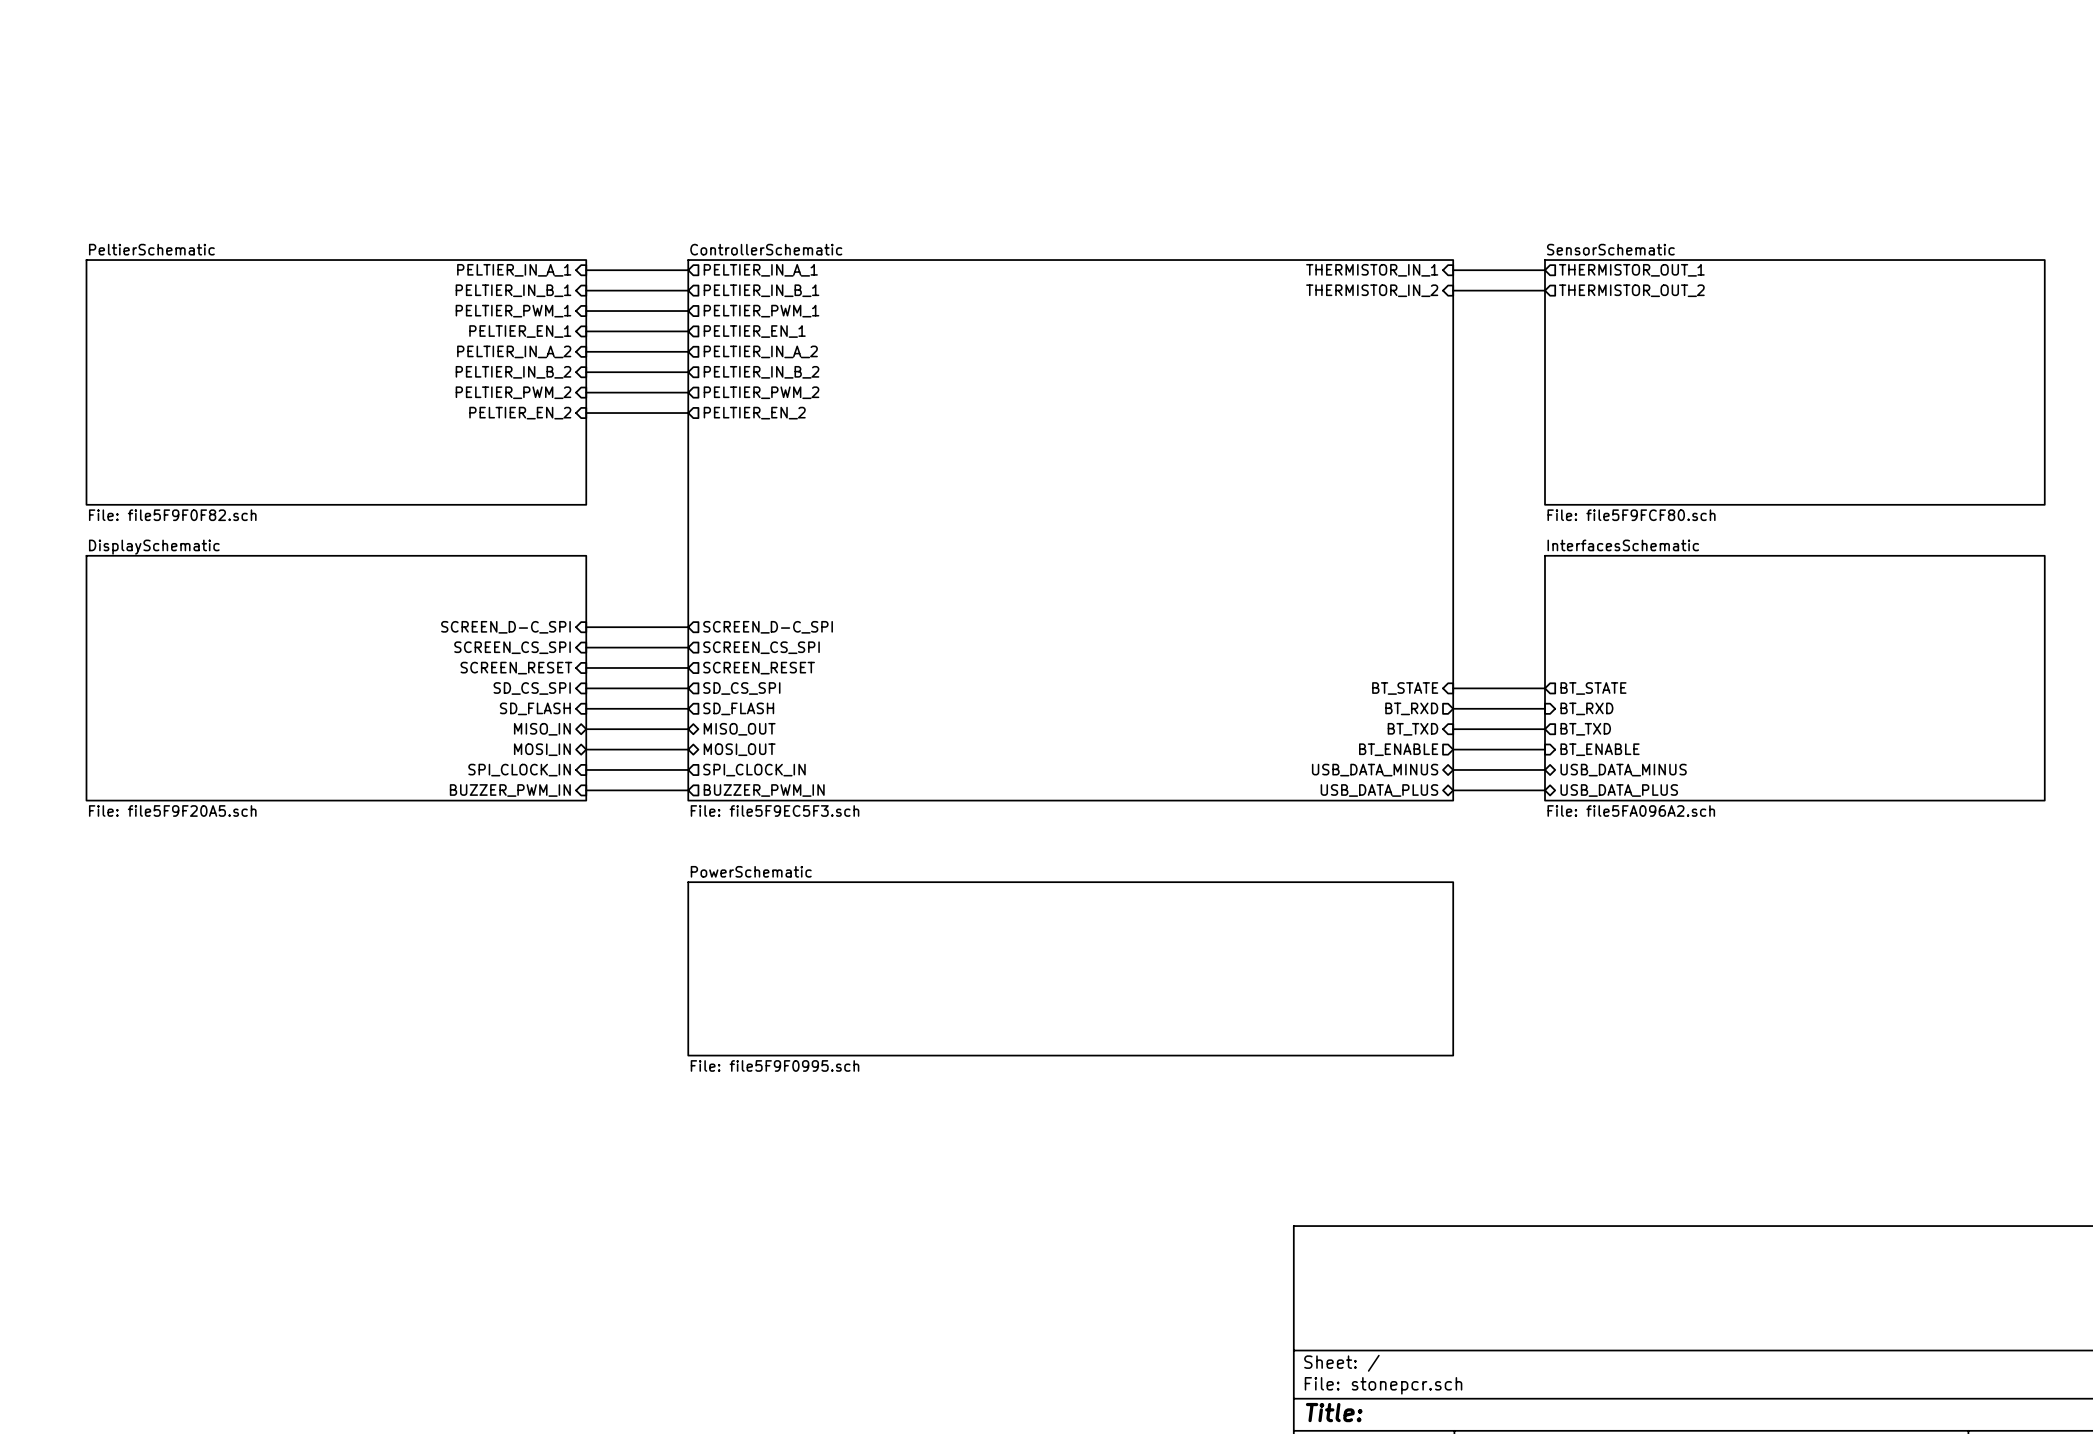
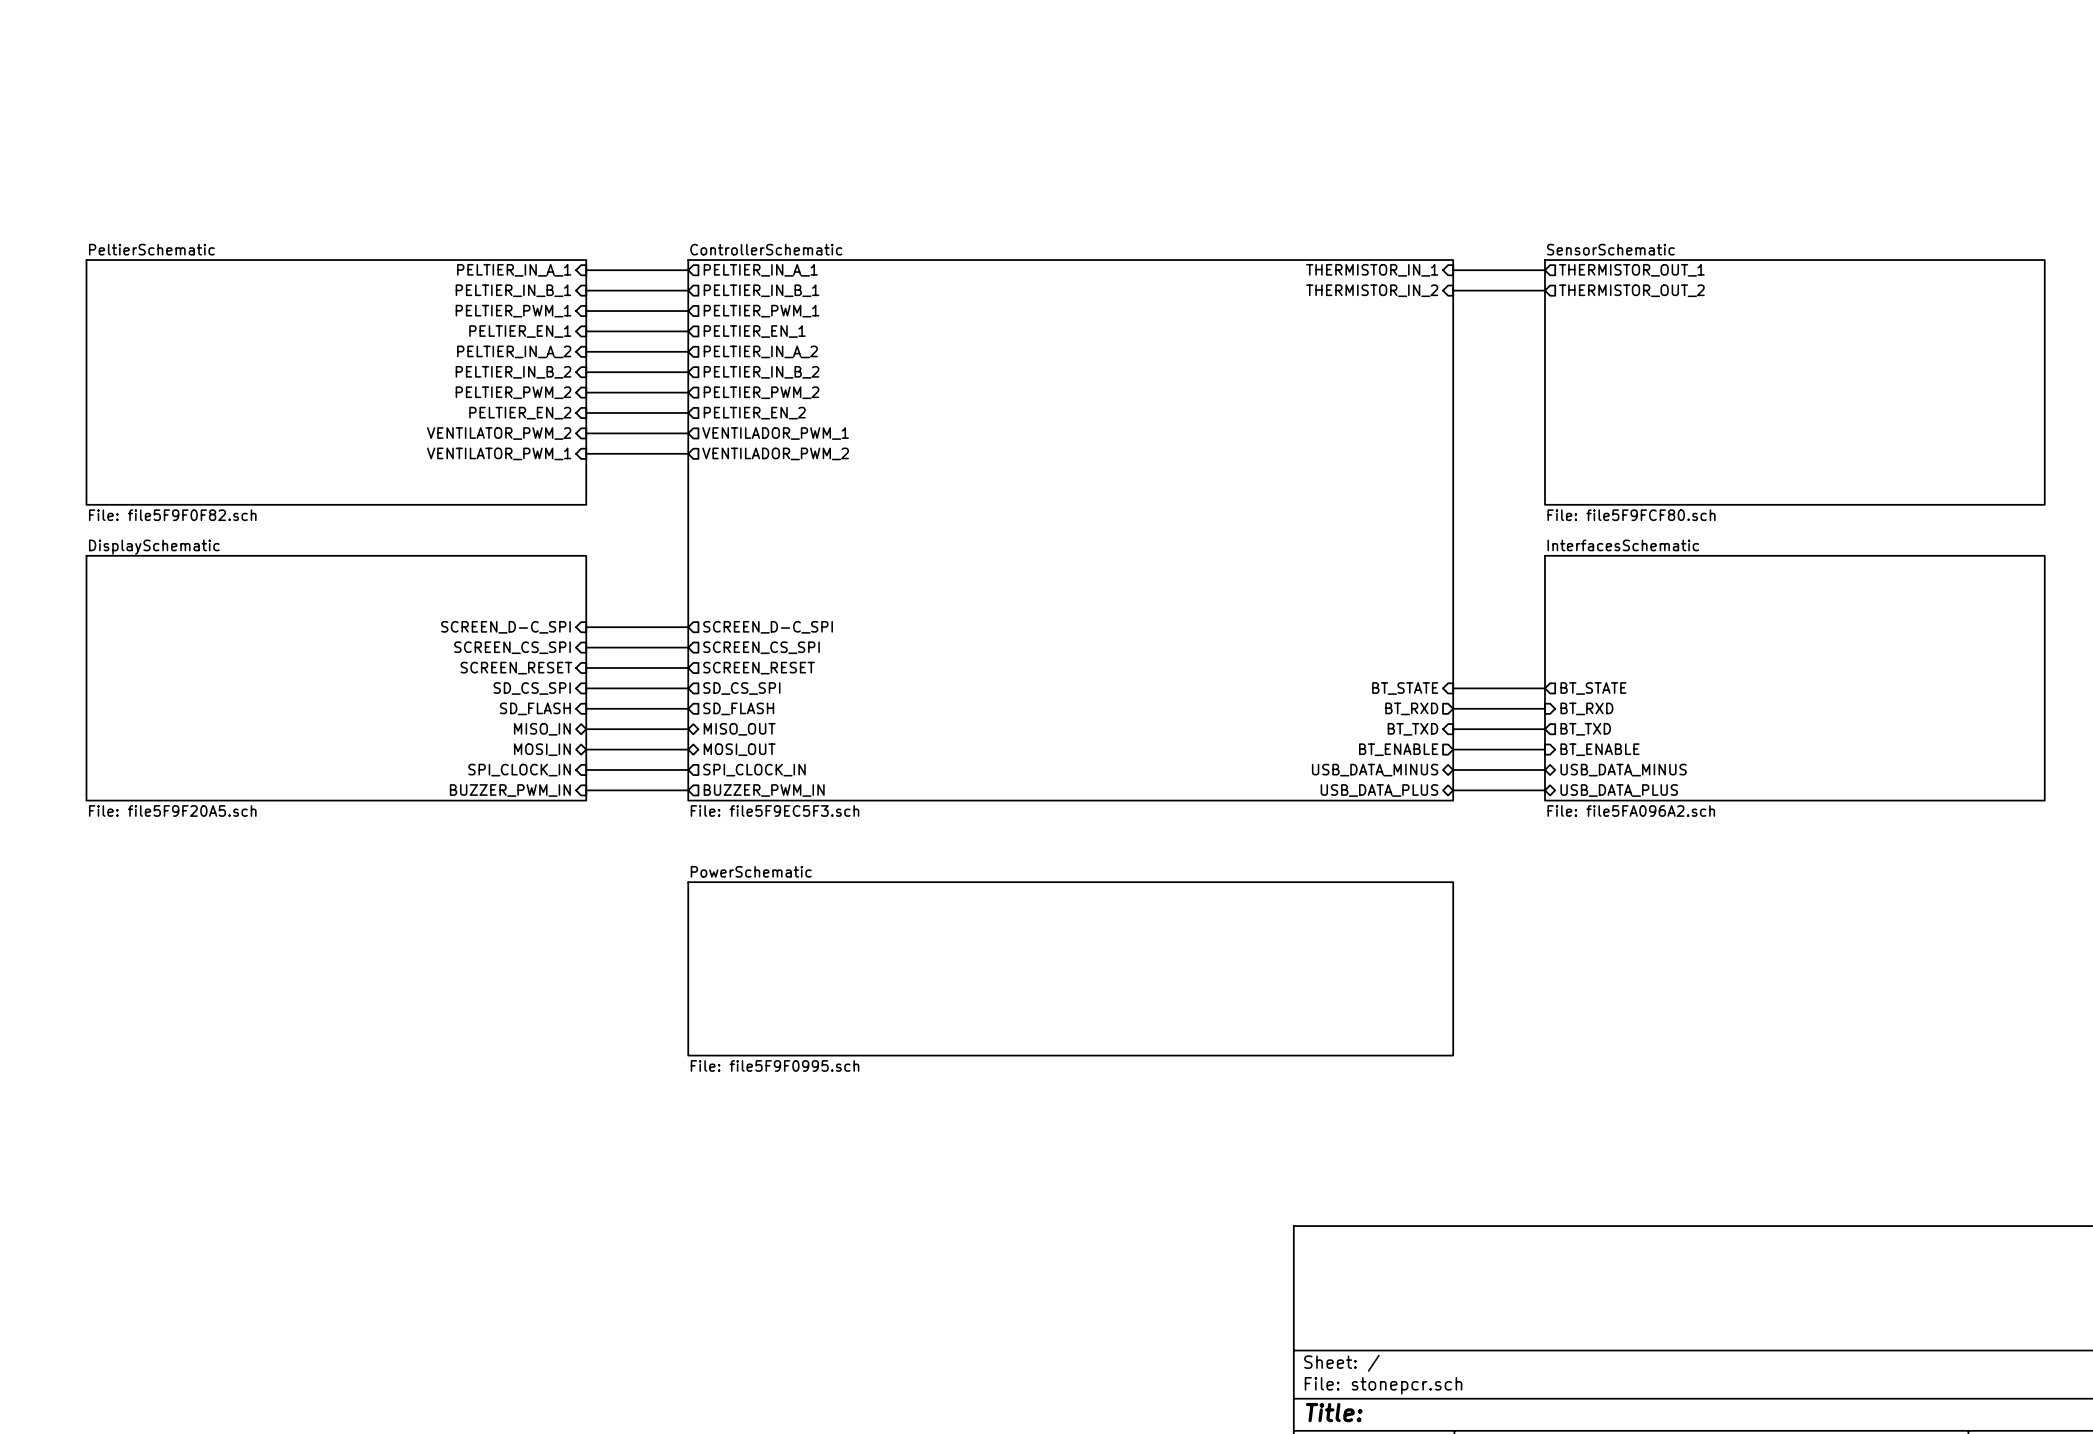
sheet pin: none -> VENTILATOR_PWM_2 (499, 433)
wire: none -> (586, 433) (688, 433)
sheet pin: none -> VENTILADOR_PWM_1 (775, 433)
sheet pin: none -> VENTILATOR_PWM_1 (499, 453)
wire: none -> (586, 453) (688, 453)
sheet pin: none -> VENTILADOR_PWM_2 (775, 453)

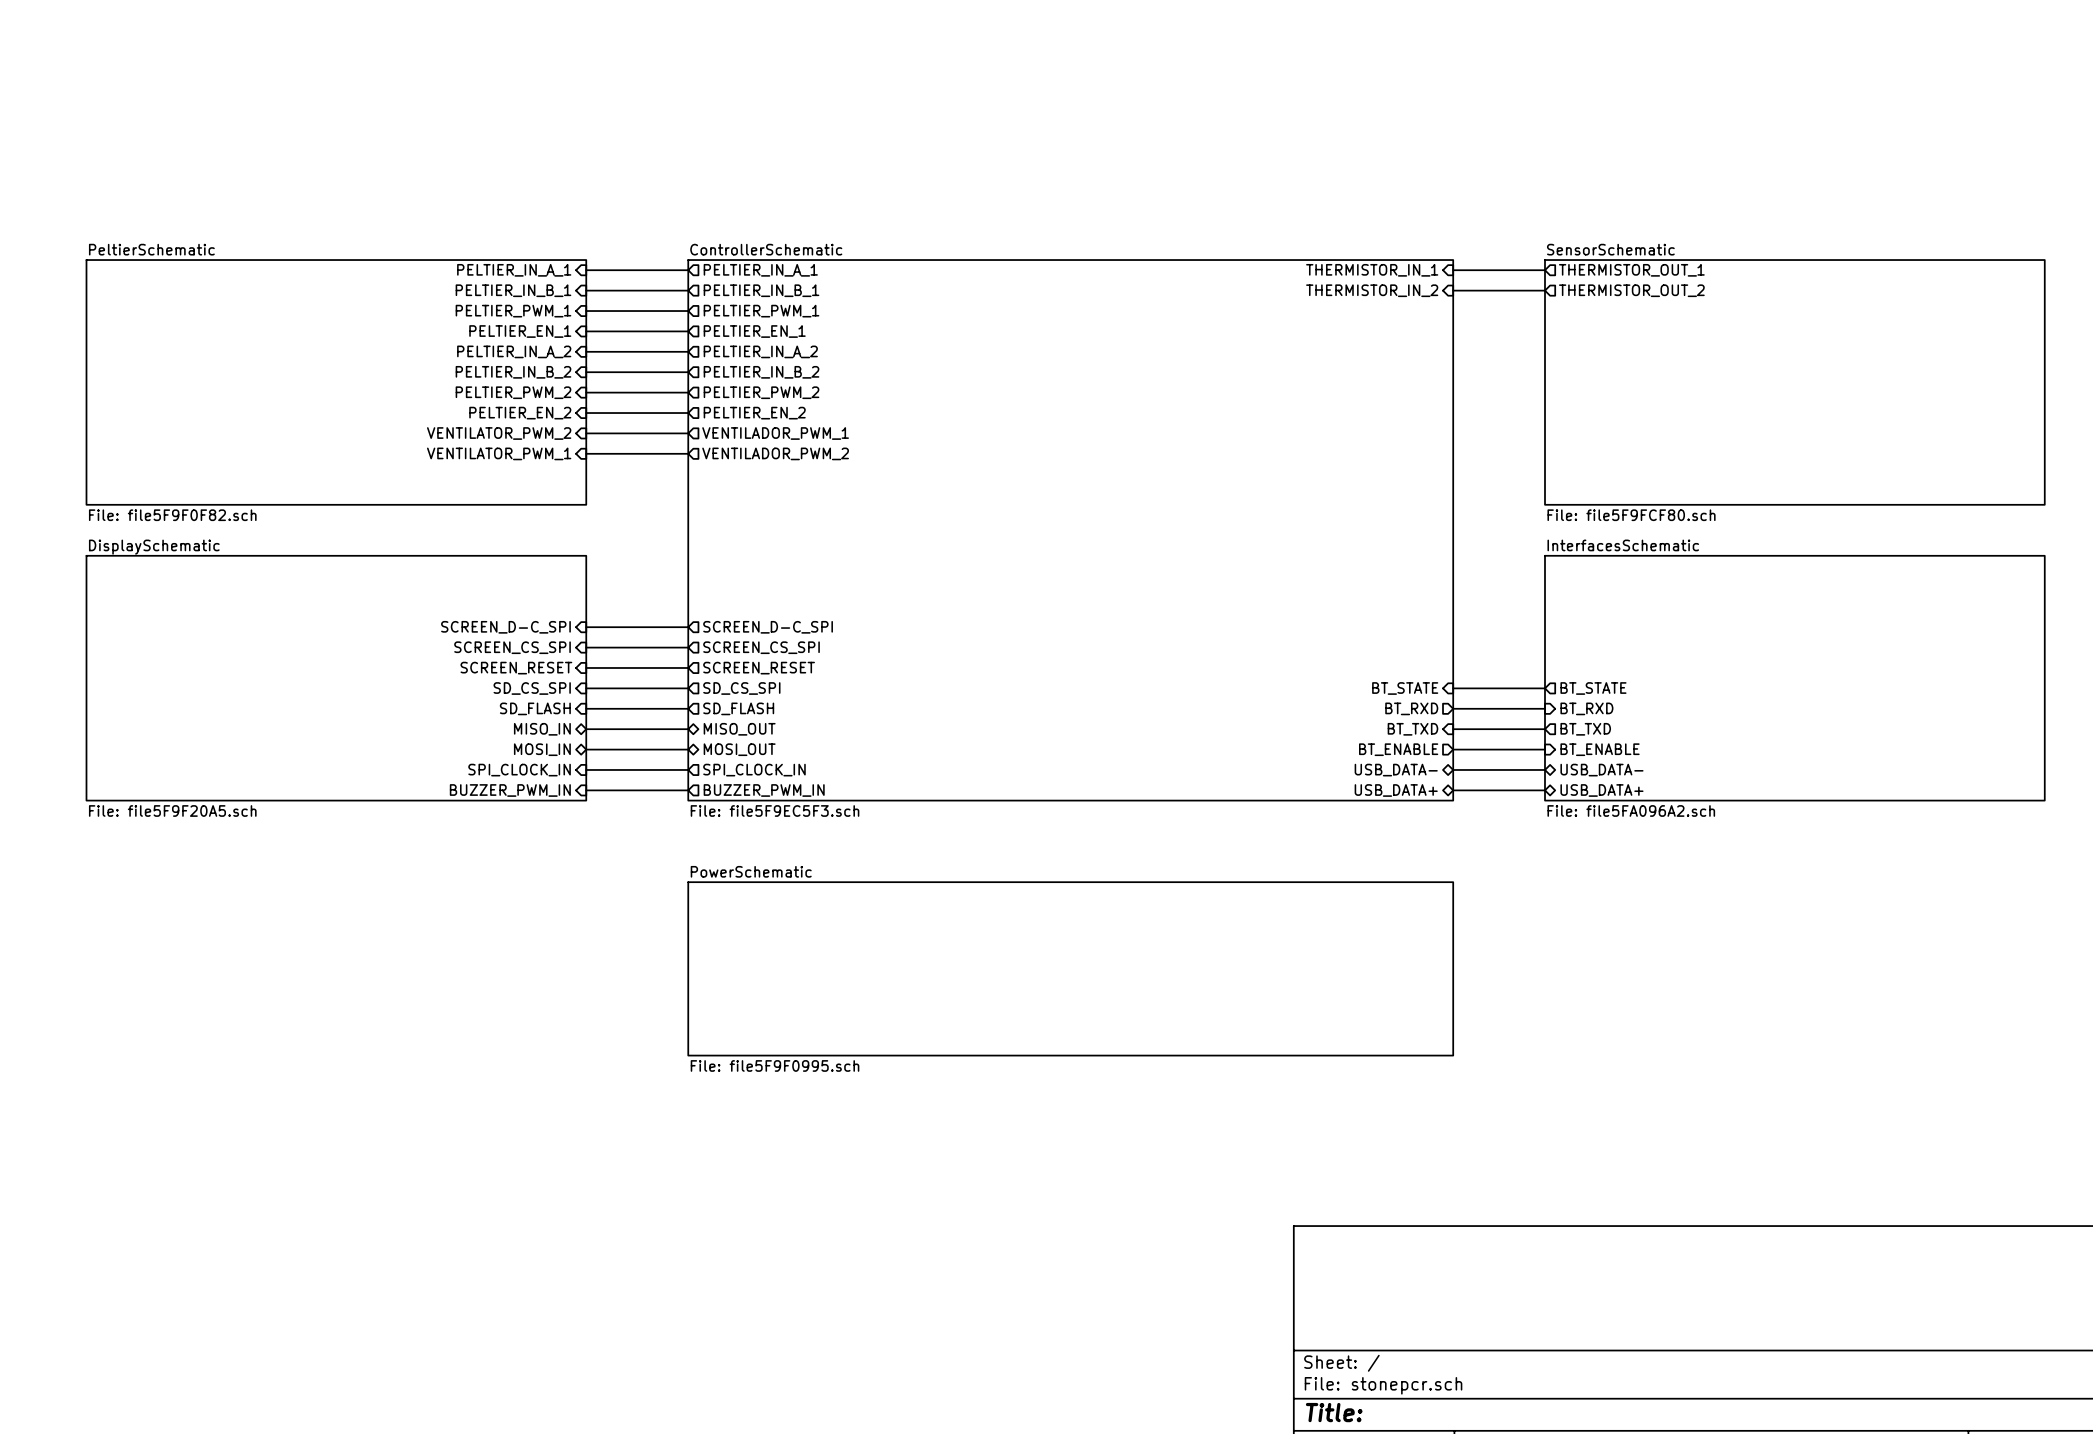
sheet pin: USB_DATA_MINUS (1375, 770) -> USB_DATA- (1396, 770)
sheet pin: USB_DATA_MINUS (1623, 770) -> USB_DATA- (1601, 770)
sheet pin: USB_DATA_PLUS (1379, 790) -> USB_DATA+ (1396, 790)
sheet pin: USB_DATA_PLUS (1619, 790) -> USB_DATA+ (1601, 790)

